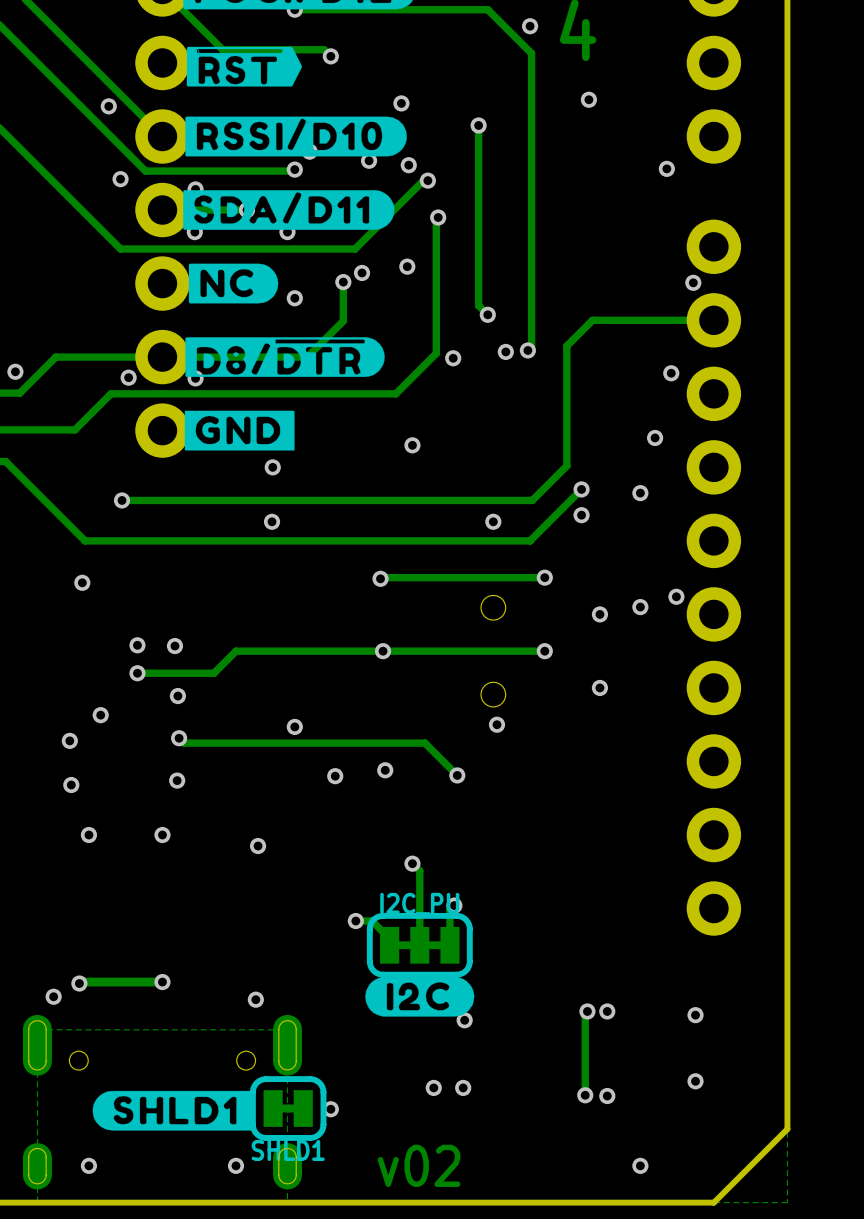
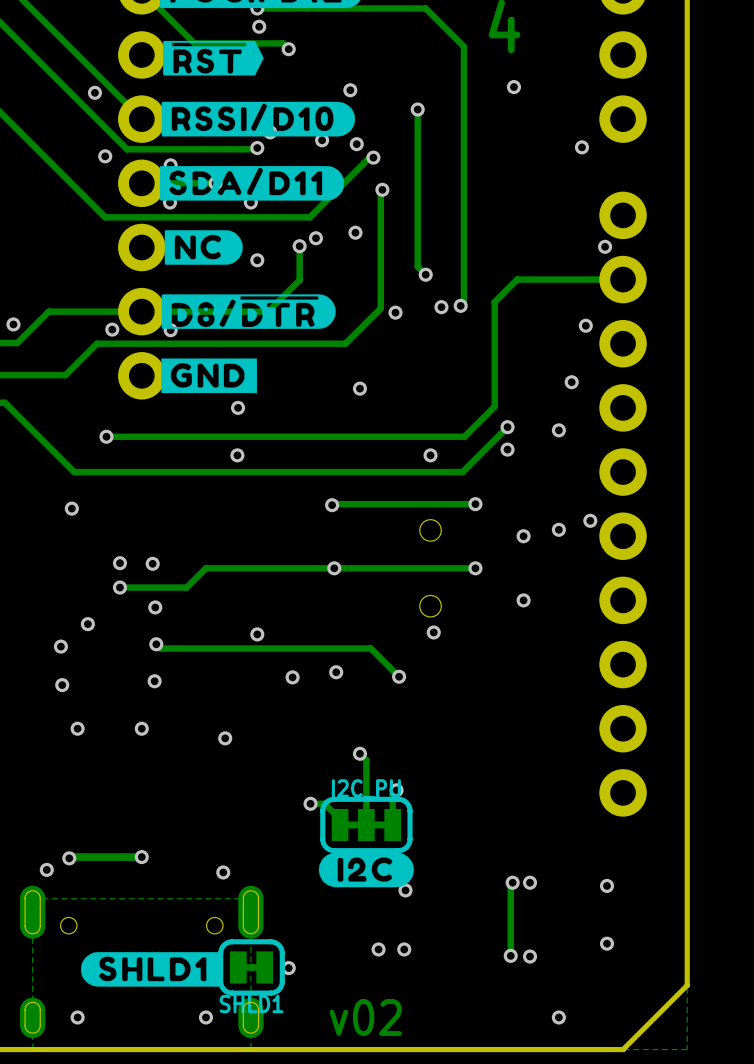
via: (530, 26) -> none
via: none -> (259, 26)

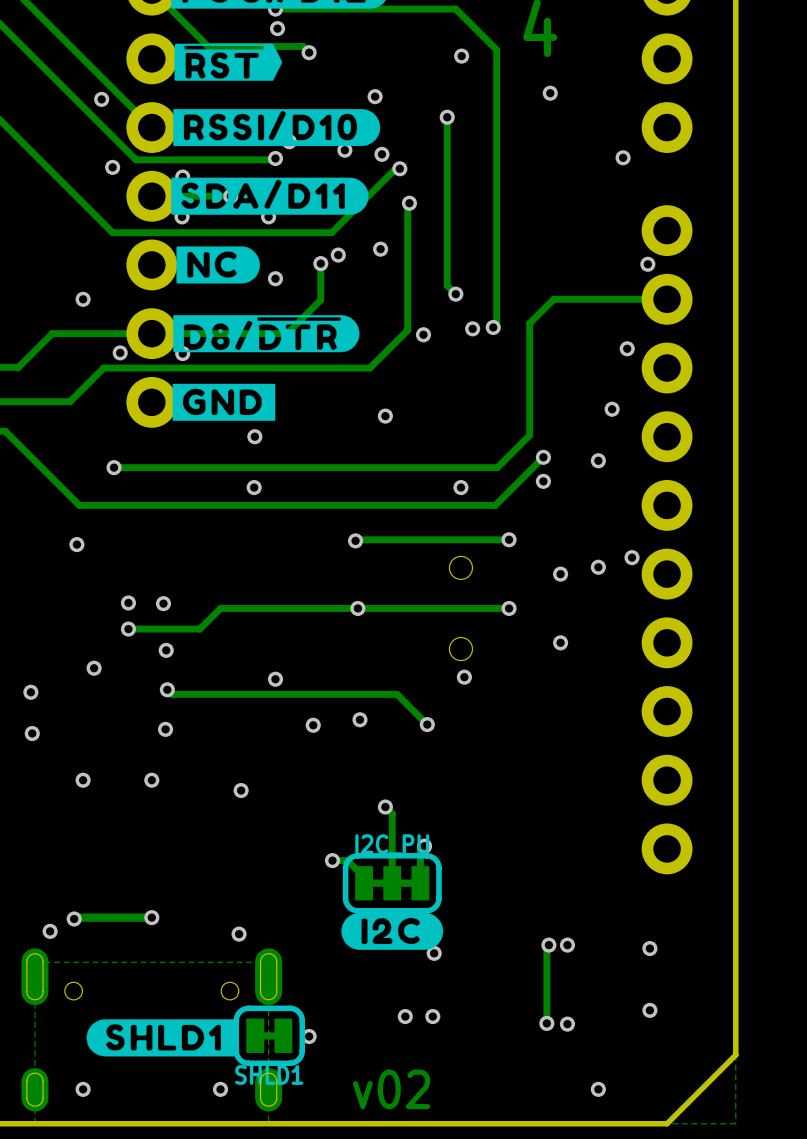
via: none -> (461, 56)
via: none -> (83, 299)
via: (13, 324) -> none
via: none -> (30, 692)
via: (60, 646) -> none
via: none -> (32, 733)
via: (62, 685) -> none

